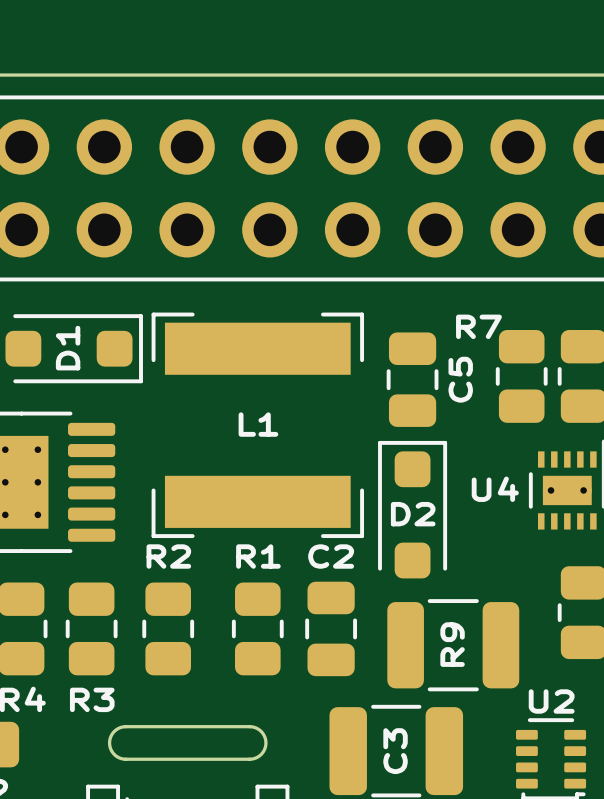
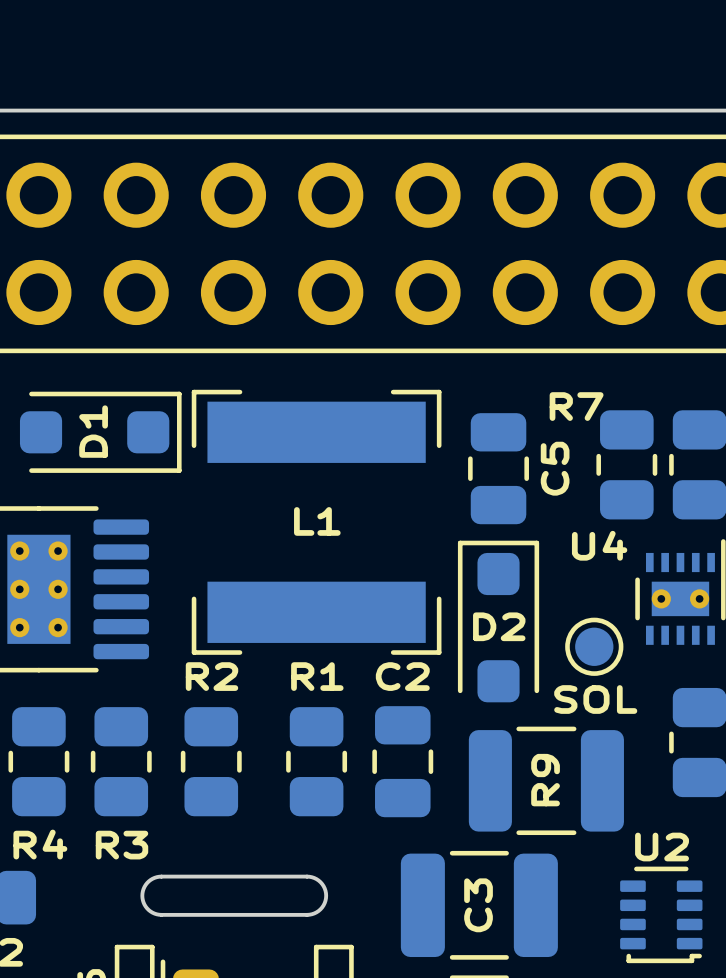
U4 name position: U4 (495, 489) -> U4 (599, 545)
part: none -> (594, 646)
text: none -> SOL (595, 699)

